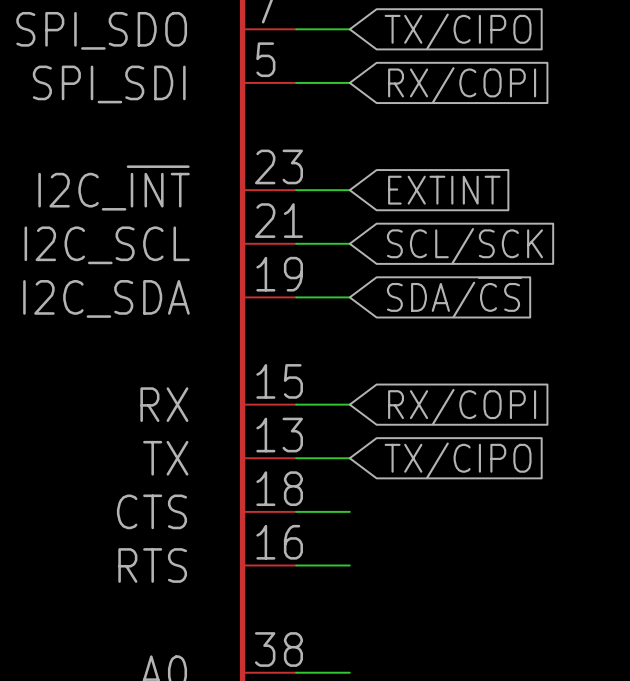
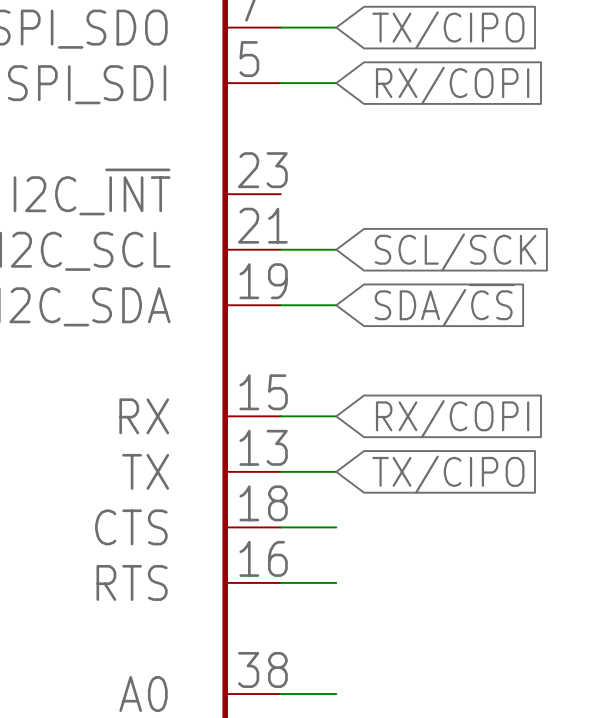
wire: (296, 190) (349, 190) -> none
global label: EXTINT (444, 190) -> none

